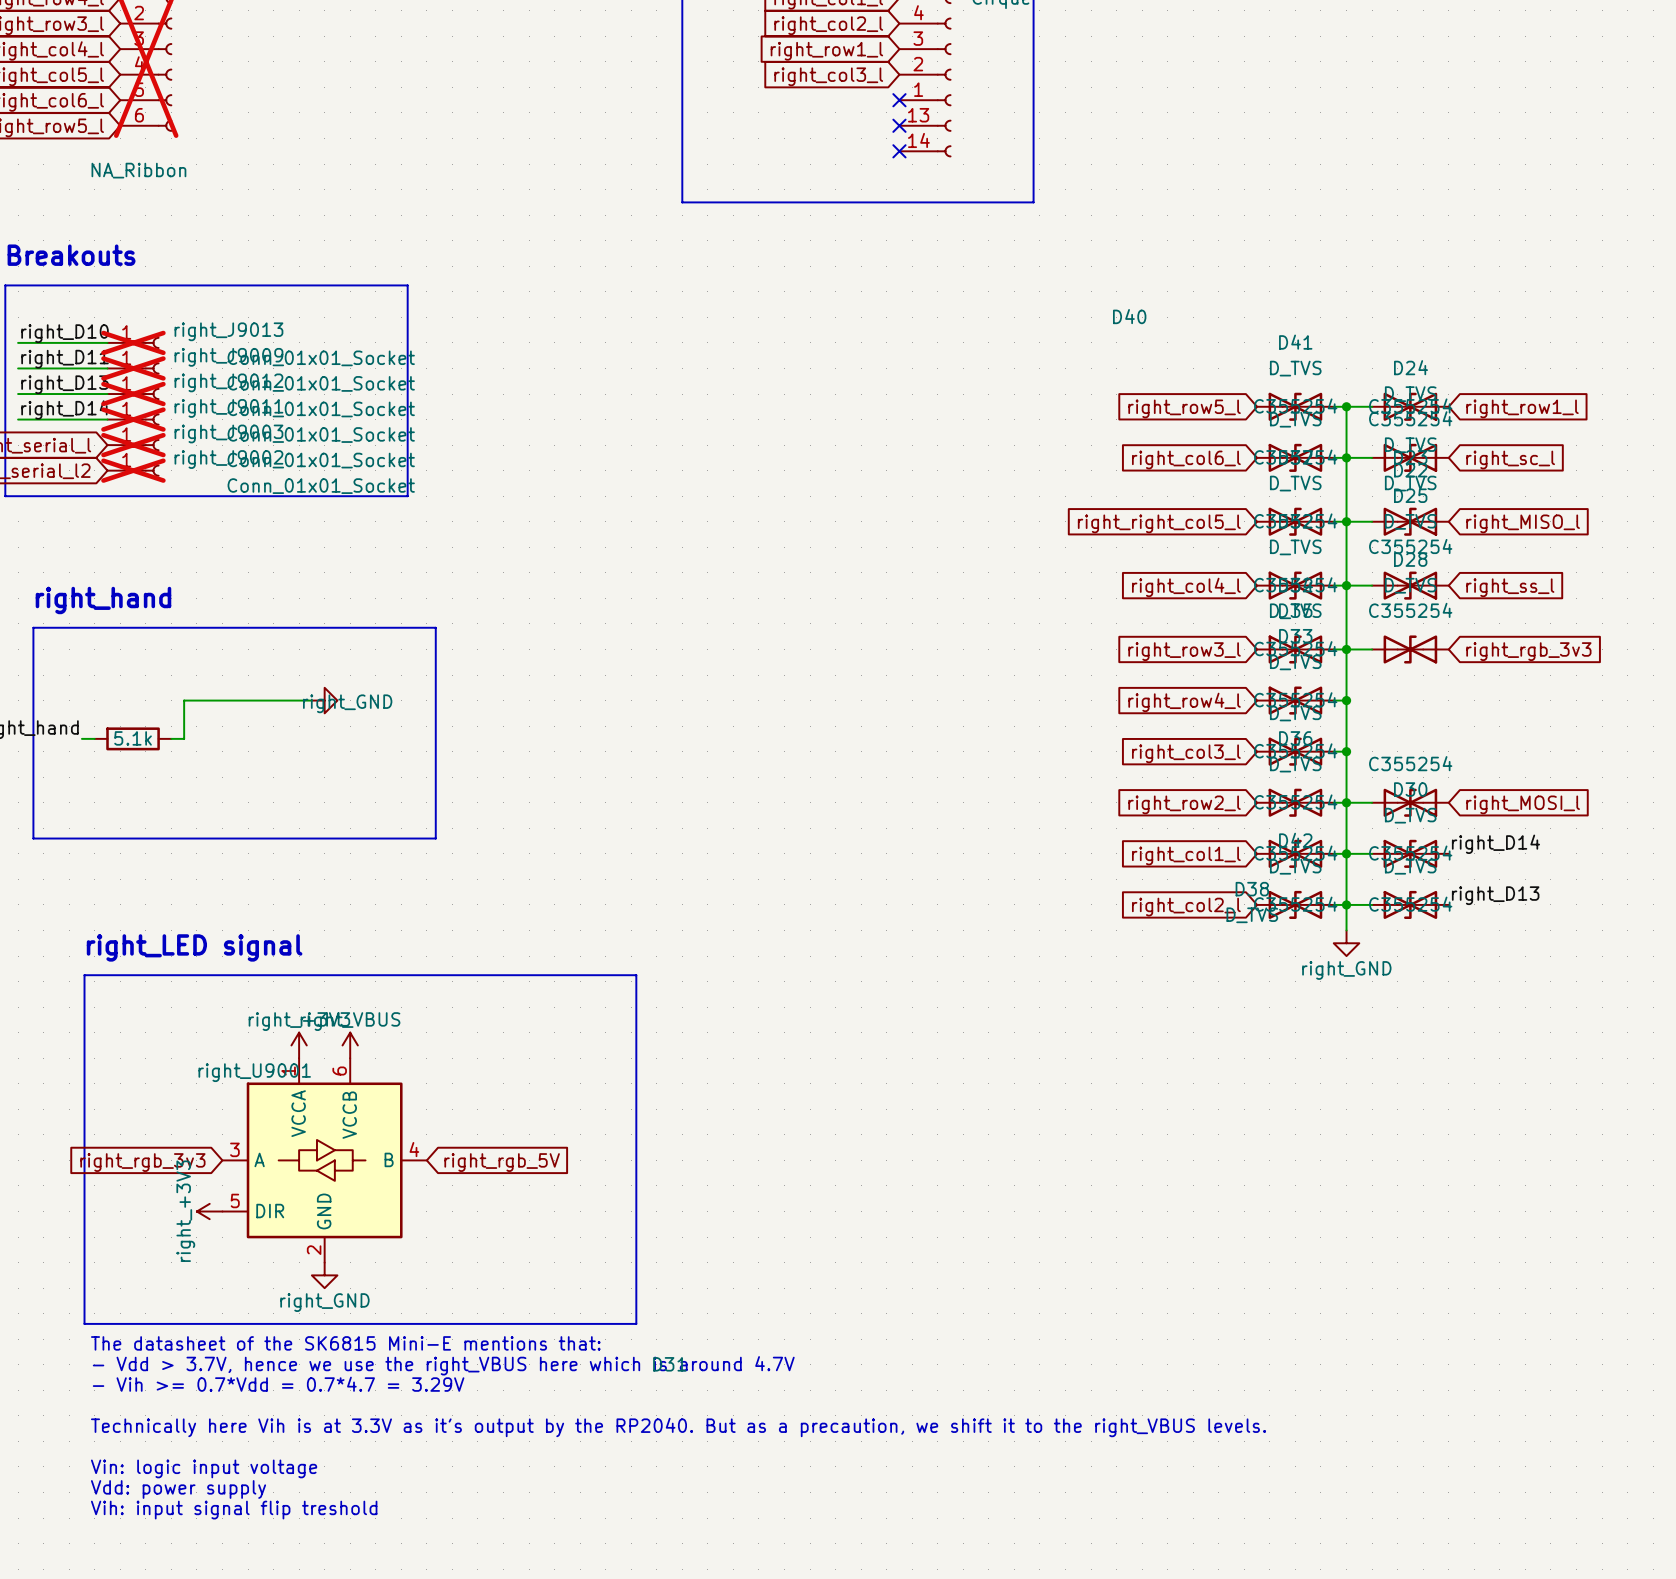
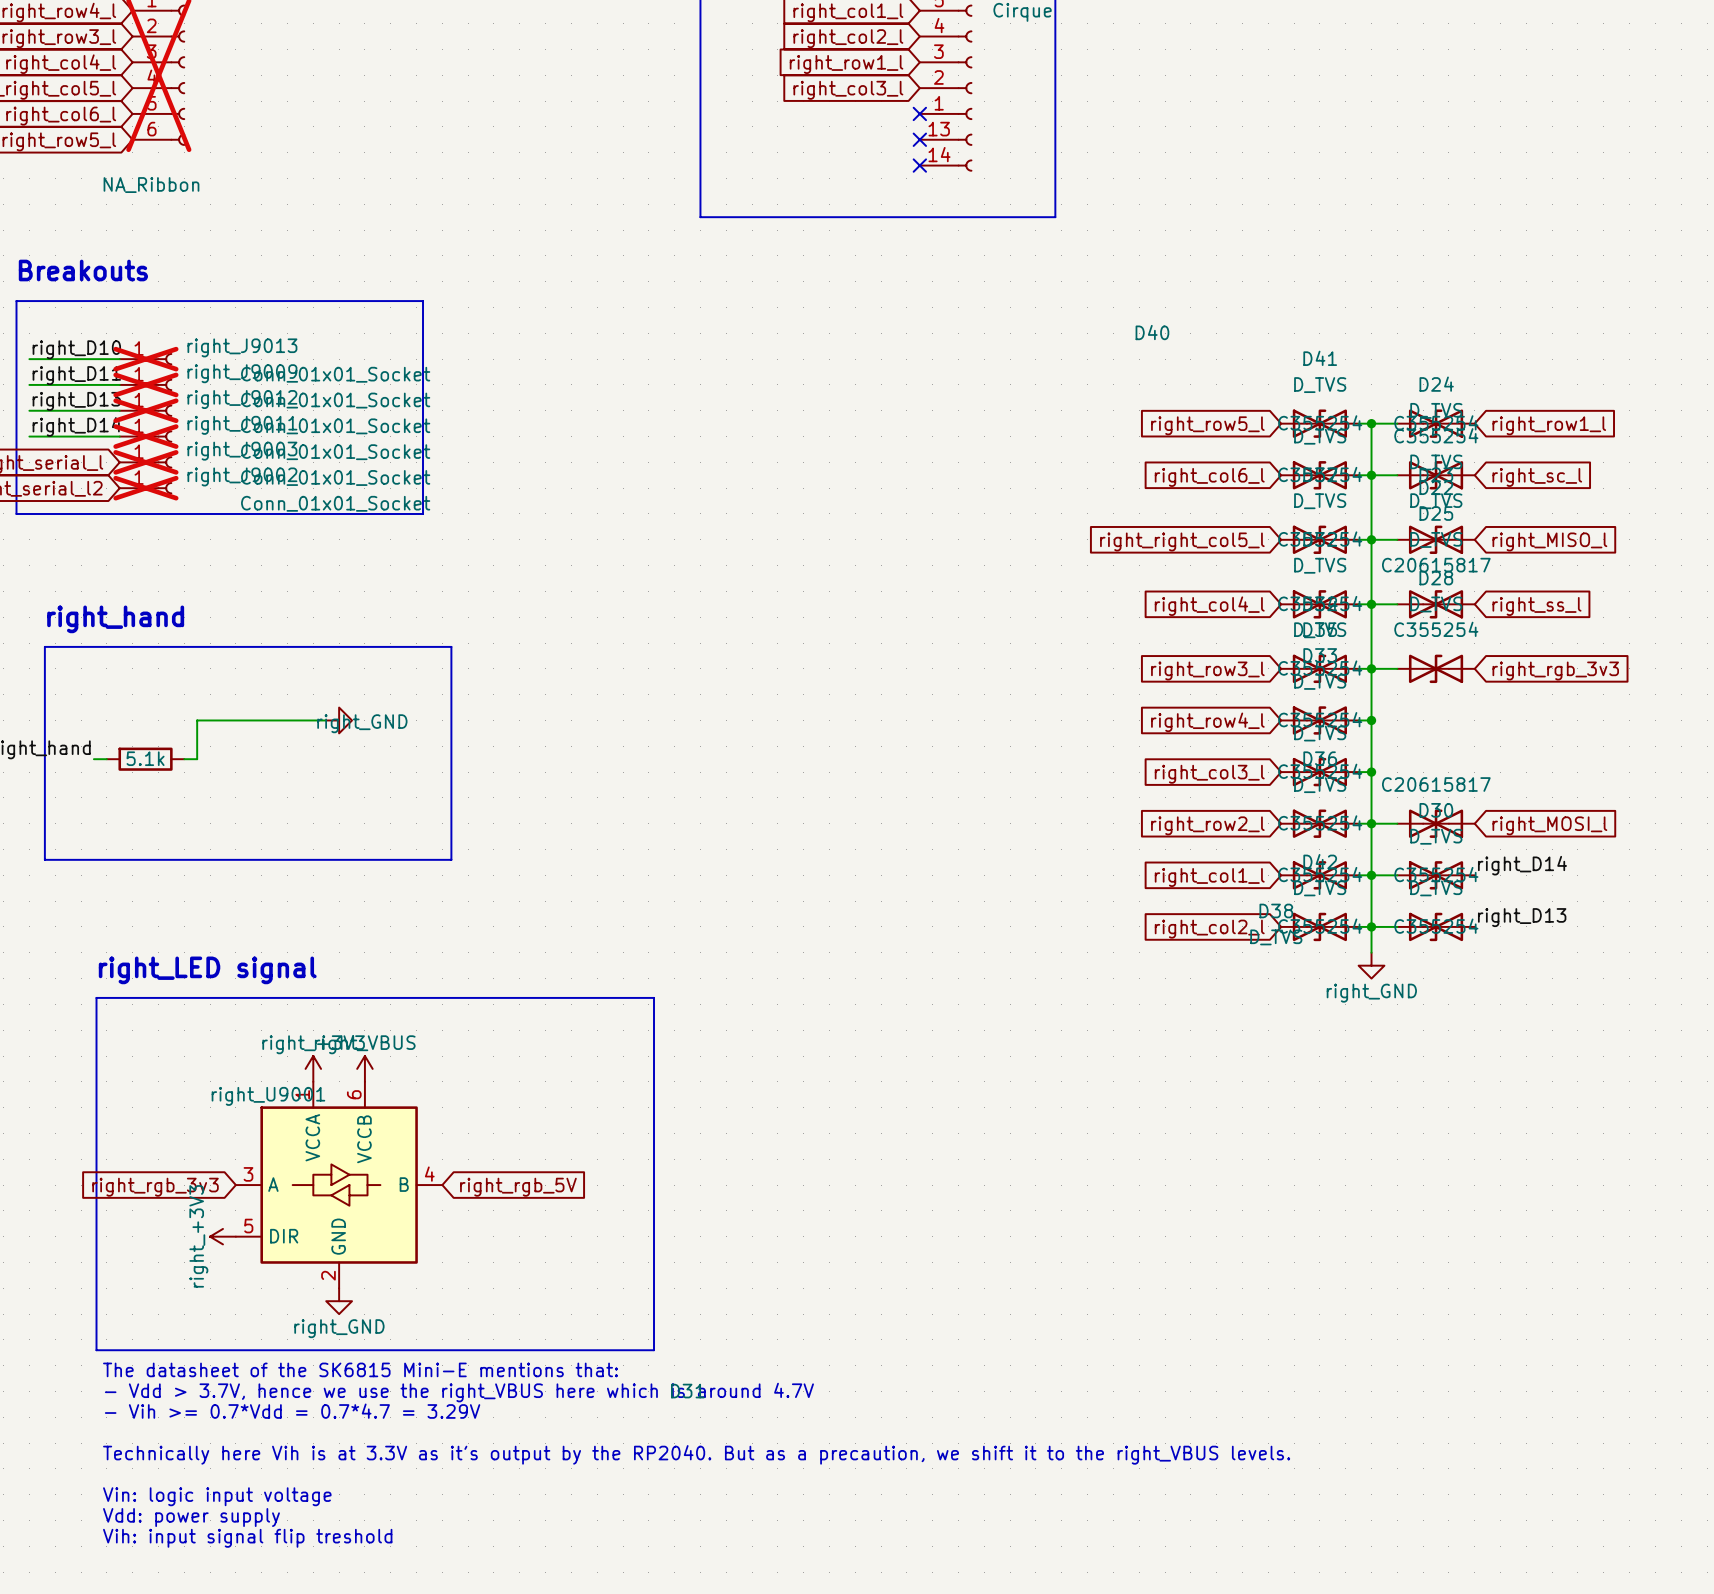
D25 text: C355254 (1410, 546) -> C20615817 (1436, 565)
part text: C355254 (1410, 763) -> C20615817 (1436, 784)

